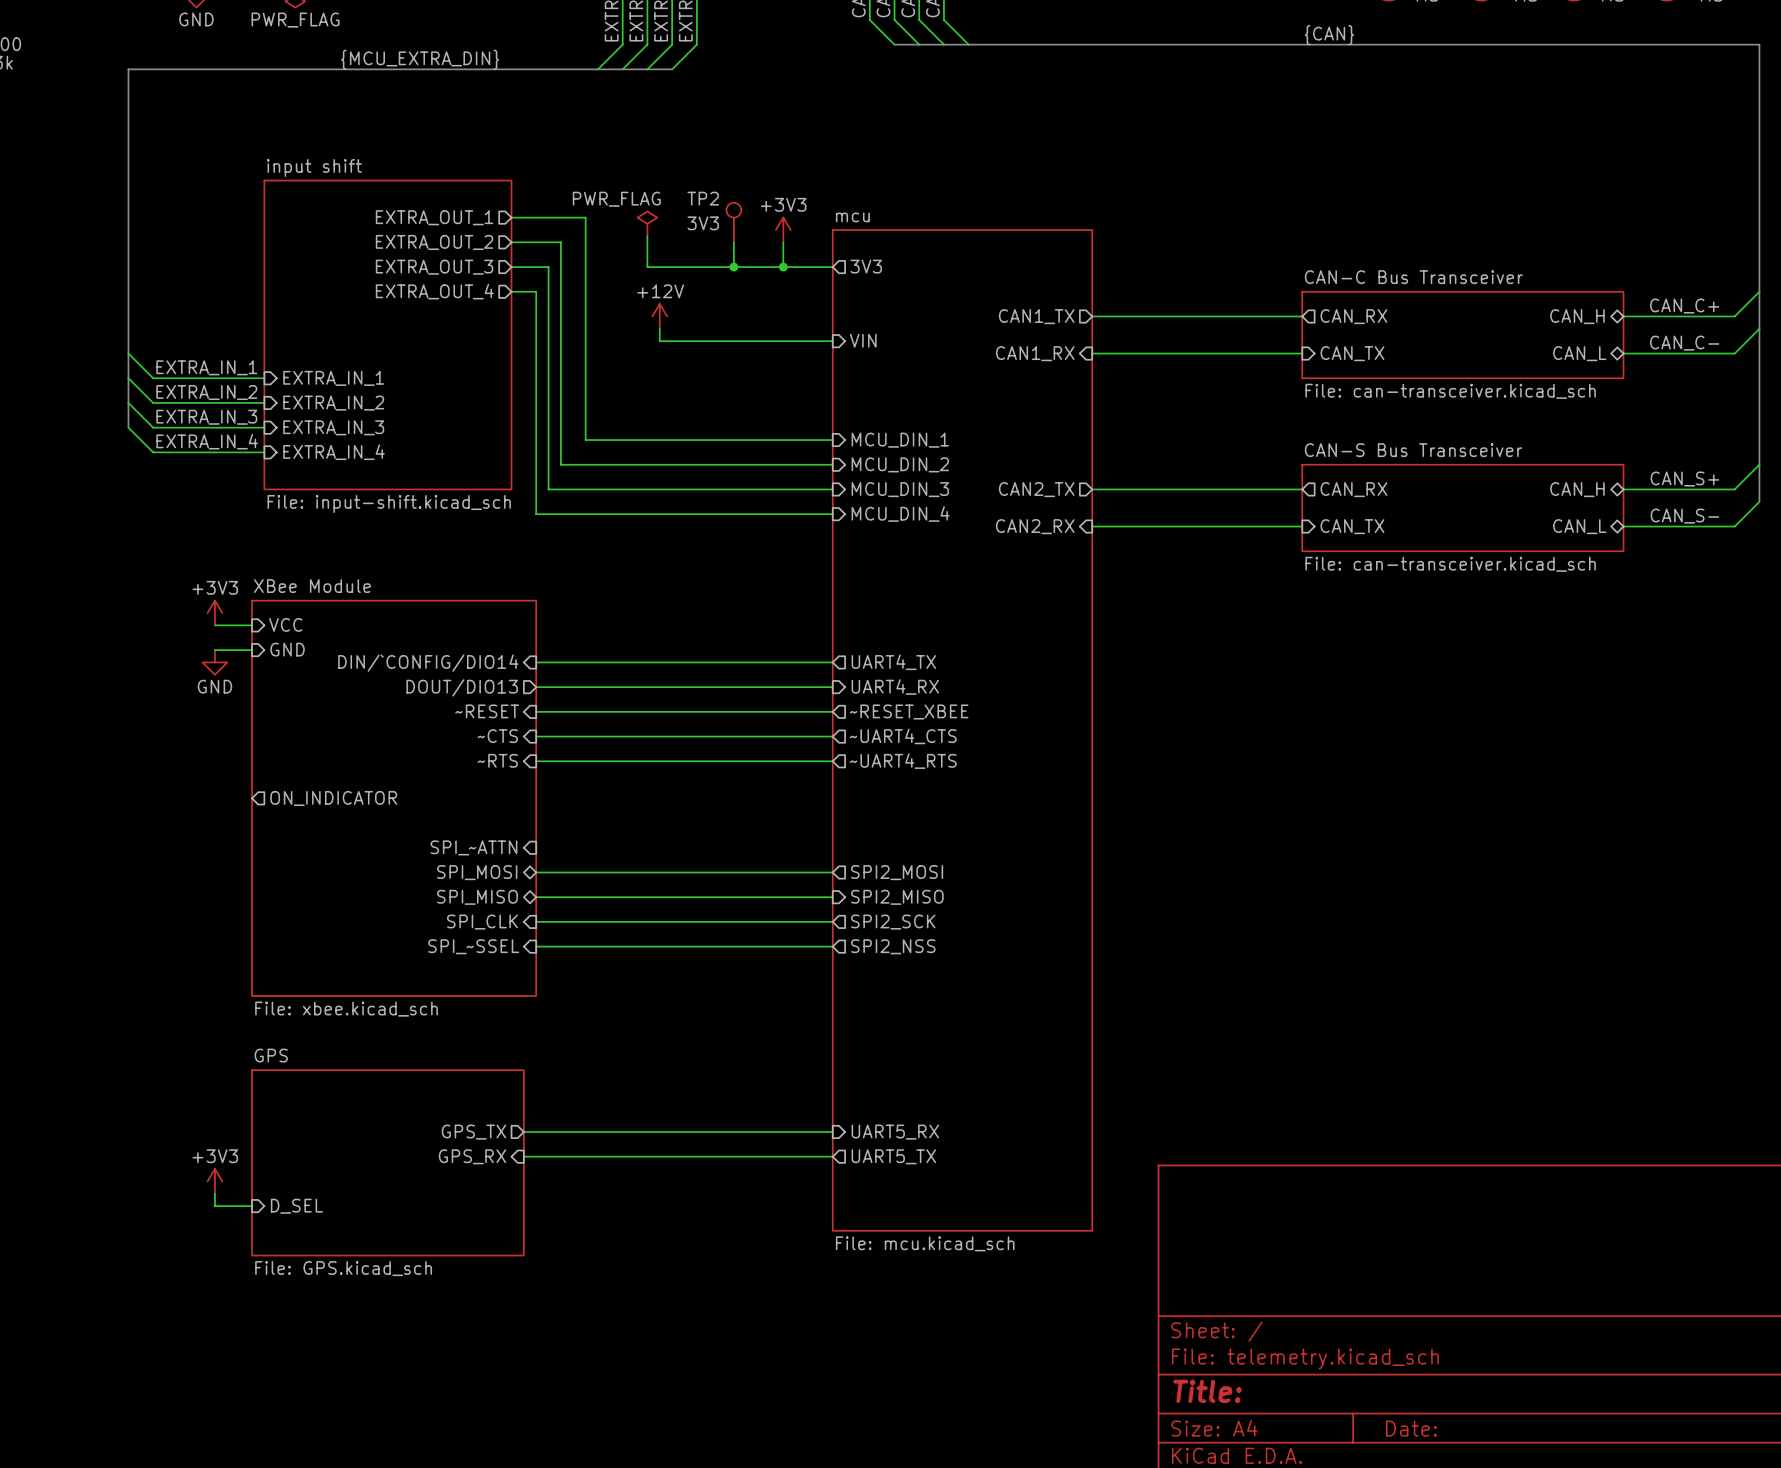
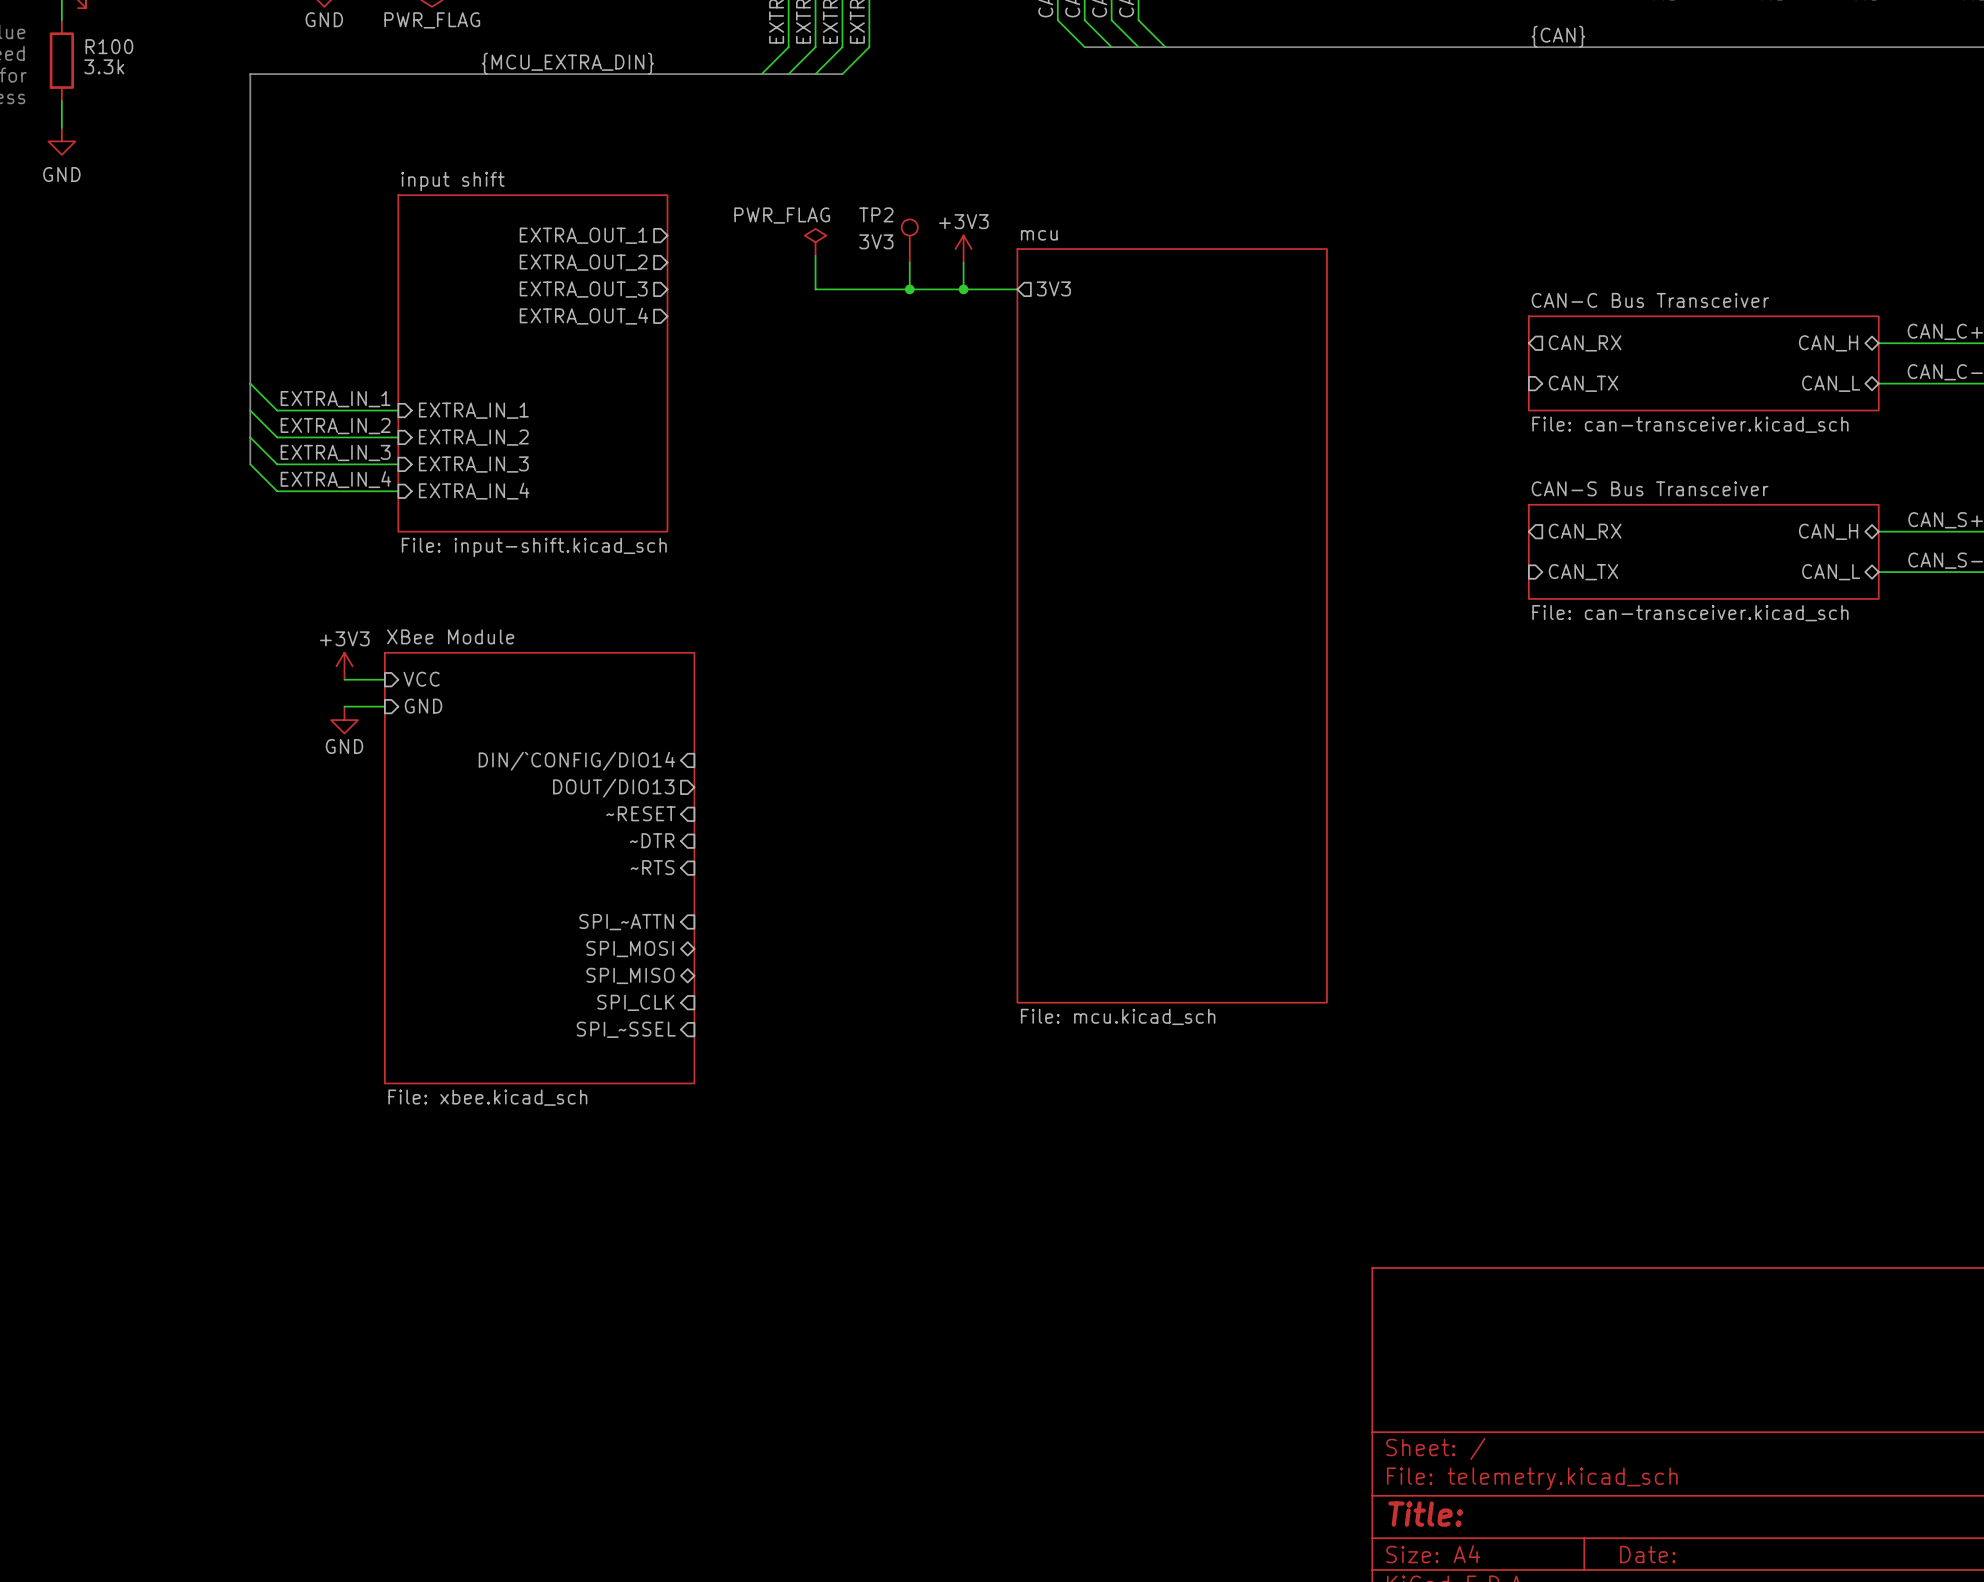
wire: (511, 217) (585, 217) (585, 440) (832, 440) -> none
wire: (511, 242) (560, 242) (560, 464) (832, 464) -> none
wire: (511, 267) (548, 267) (548, 489) (832, 489) -> none
wire: (511, 291) (536, 291) (536, 514) (832, 514) -> none
power symbol: +12V (659, 316) -> none
sheet pin: CAN1_TX (1036, 316) -> none
wire: (1092, 316) (1302, 316) -> none
wire: (659, 328) (659, 341) (832, 341) -> none
sheet pin: VIN (863, 340) -> none
sheet pin: CAN1_RX (1035, 353) -> none
wire: (1092, 353) (1302, 353) -> none
sheet pin: MCU_DIN_1 (900, 440) -> none
sheet pin: MCU_DIN_2 (900, 464) -> none
sheet pin: MCU_DIN_3 (900, 489) -> none
sheet pin: CAN2_TX (1036, 489) -> none
wire: (1092, 489) (1302, 489) -> none
sheet pin: MCU_DIN_4 (900, 514) -> none
sheet pin: CAN2_RX (1035, 526) -> none
wire: (1092, 526) (1302, 526) -> none
sheet mcu: none -> File: mcu.kicad_sch (1172, 625)
wire: (536, 662) (832, 662) -> none
sheet pin: UART4_TX (893, 662) -> none
sheet pin position: DIN/`CONFIG/DIO14 (428, 663) -> DIN/`CONFIG/DIO14 (576, 761)
sheet pin: UART4_RX (895, 686) -> none
sheet pin position: DOUT/DIO13 (462, 687) -> DOUT/DIO13 (613, 788)
wire: (536, 687) (832, 687) -> none
sheet pin position: ~RESET (487, 711) -> ~RESET (641, 813)
wire: (536, 711) (832, 711) -> none
sheet pin: ~RESET_XBEE (909, 711) -> none
sheet mcu: File: mcu.kicad_sch (962, 730) -> none
sheet pin: ~CTS (497, 736) -> none
wire: (536, 736) (832, 736) -> none
sheet pin: ~UART4_CTS (903, 736) -> none
sheet pin position: ~RTS (497, 760) -> ~RTS (652, 867)
wire: (536, 761) (832, 761) -> none
sheet pin: ~UART4_RTS (903, 761) -> none
sheet pin: none -> ~DTR (652, 840)
sheet pin: ON_INDICATOR (333, 798) -> none
wire: (536, 872) (832, 872) -> none
sheet pin: SPI2_MOSI (897, 872) -> none
wire: (536, 897) (832, 897) -> none
sheet pin: SPI2_MISO (897, 897) -> none
wire: (536, 921) (832, 921) -> none
sheet pin: SPI2_SCK (893, 922) -> none
wire: (536, 946) (832, 946) -> none
sheet pin: SPI2_NSS (893, 946) -> none
wire: (523, 1131) (832, 1131) -> none
sheet pin: GPS_TX (473, 1132) -> none
sheet pin: UART5_RX (895, 1132) -> none
sheet pin: GPS_RX (472, 1156) -> none
wire: (523, 1156) (832, 1156) -> none
sheet pin: UART5_TX (893, 1156) -> none
sheet GPS: File: GPS.kicad_sch (387, 1162) -> none
power symbol: +3V3 (214, 1181) -> none
wire: (214, 1193) (214, 1206) (252, 1206) -> none
sheet pin: D_SEL (296, 1206) -> none

